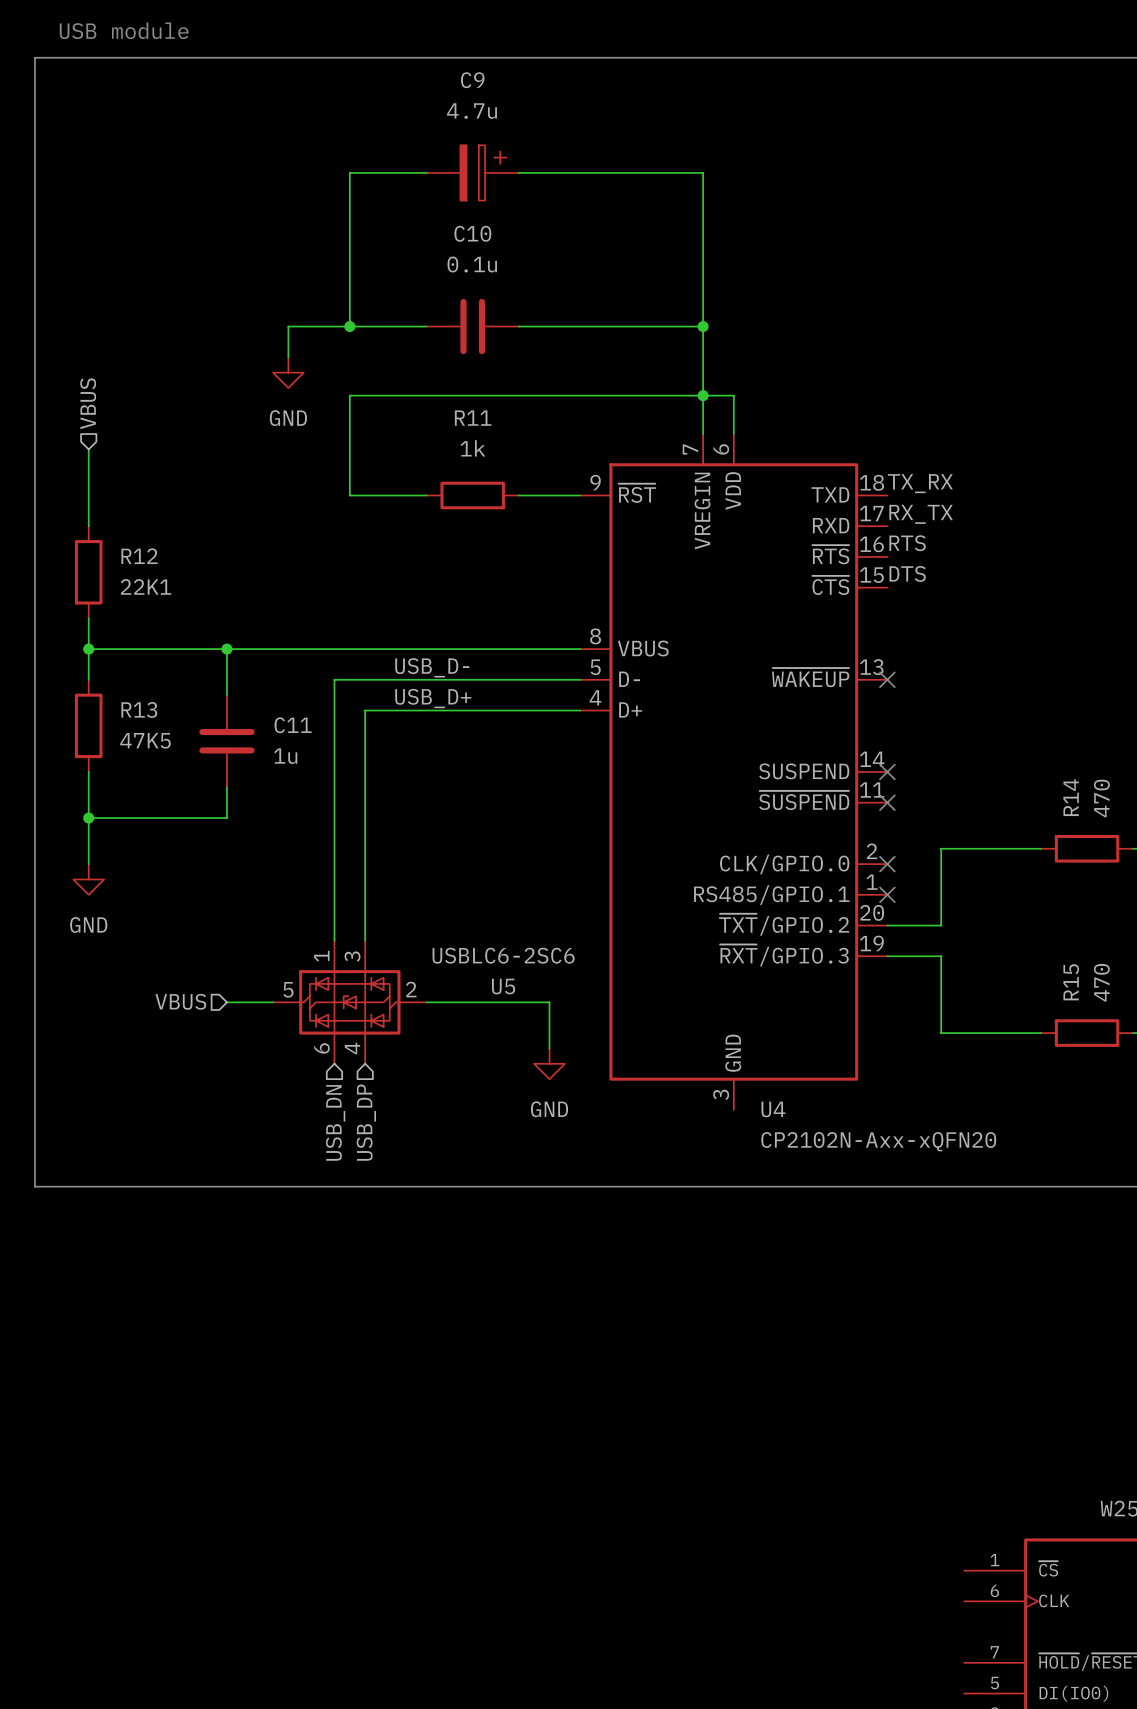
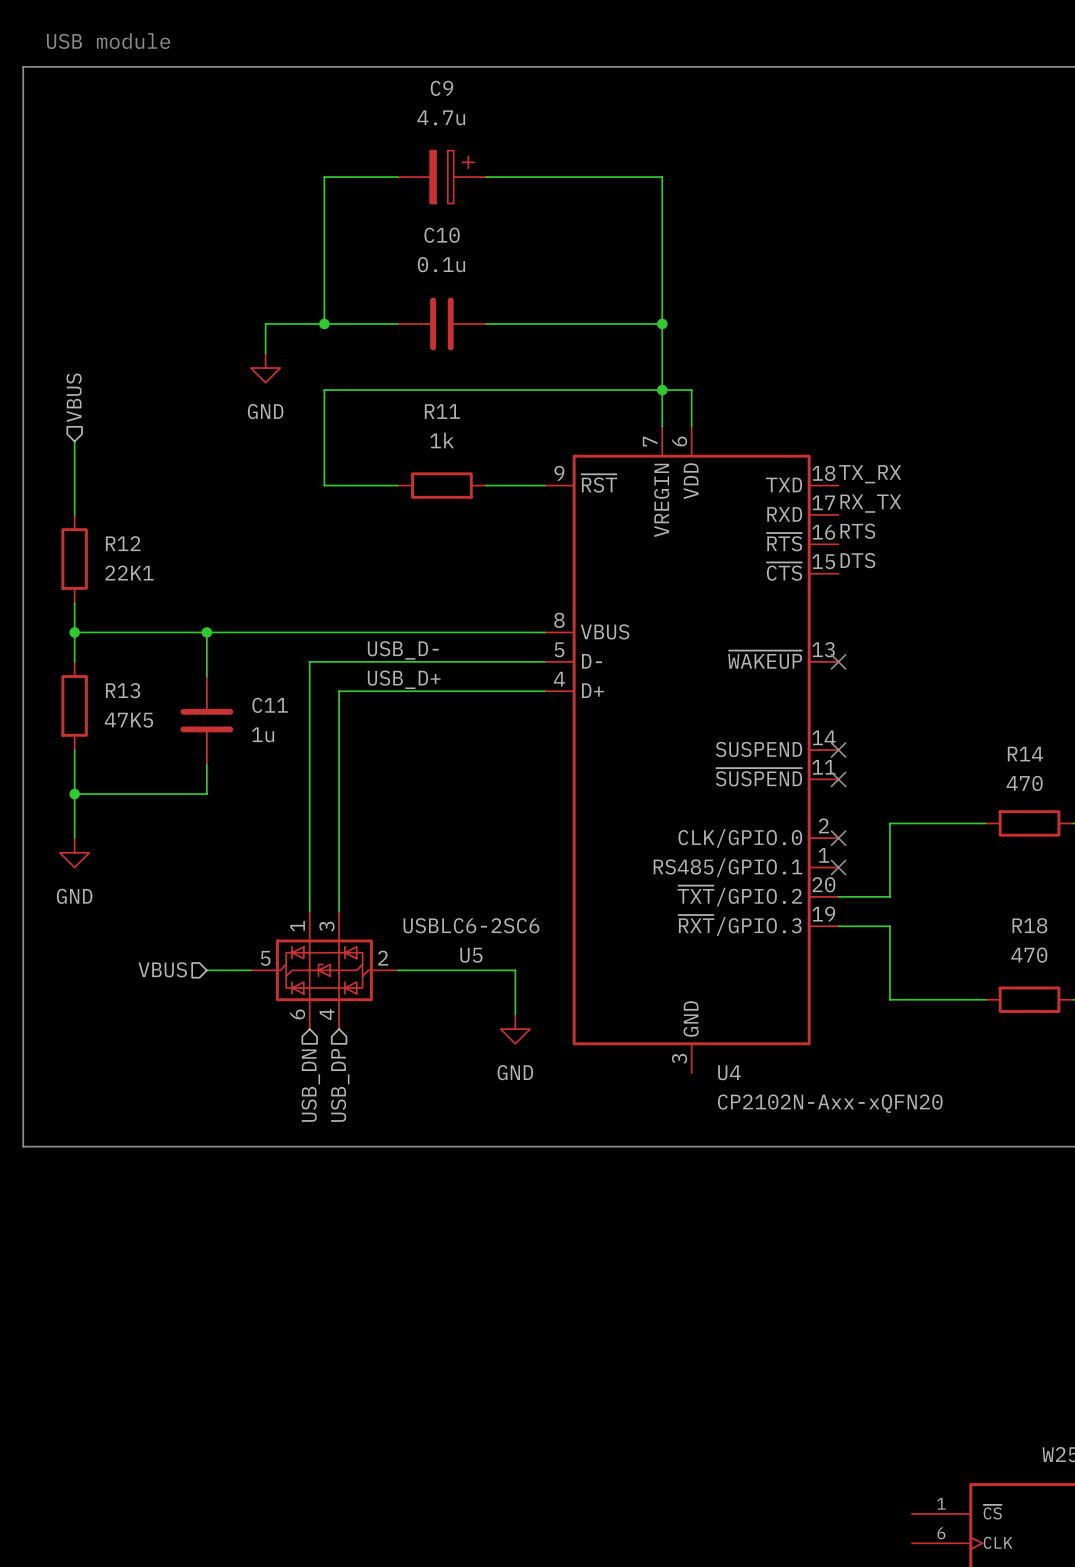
R14 name rotation: 0° (1071, 797) -> 90° clockwise (1025, 754)
R14 value rotation: 0° (1101, 798) -> 90° clockwise (1024, 783)
R15 name: R15 (1071, 982) -> R18 (1029, 925)
R15 value rotation: 0° (1101, 982) -> 90° clockwise (1029, 955)

